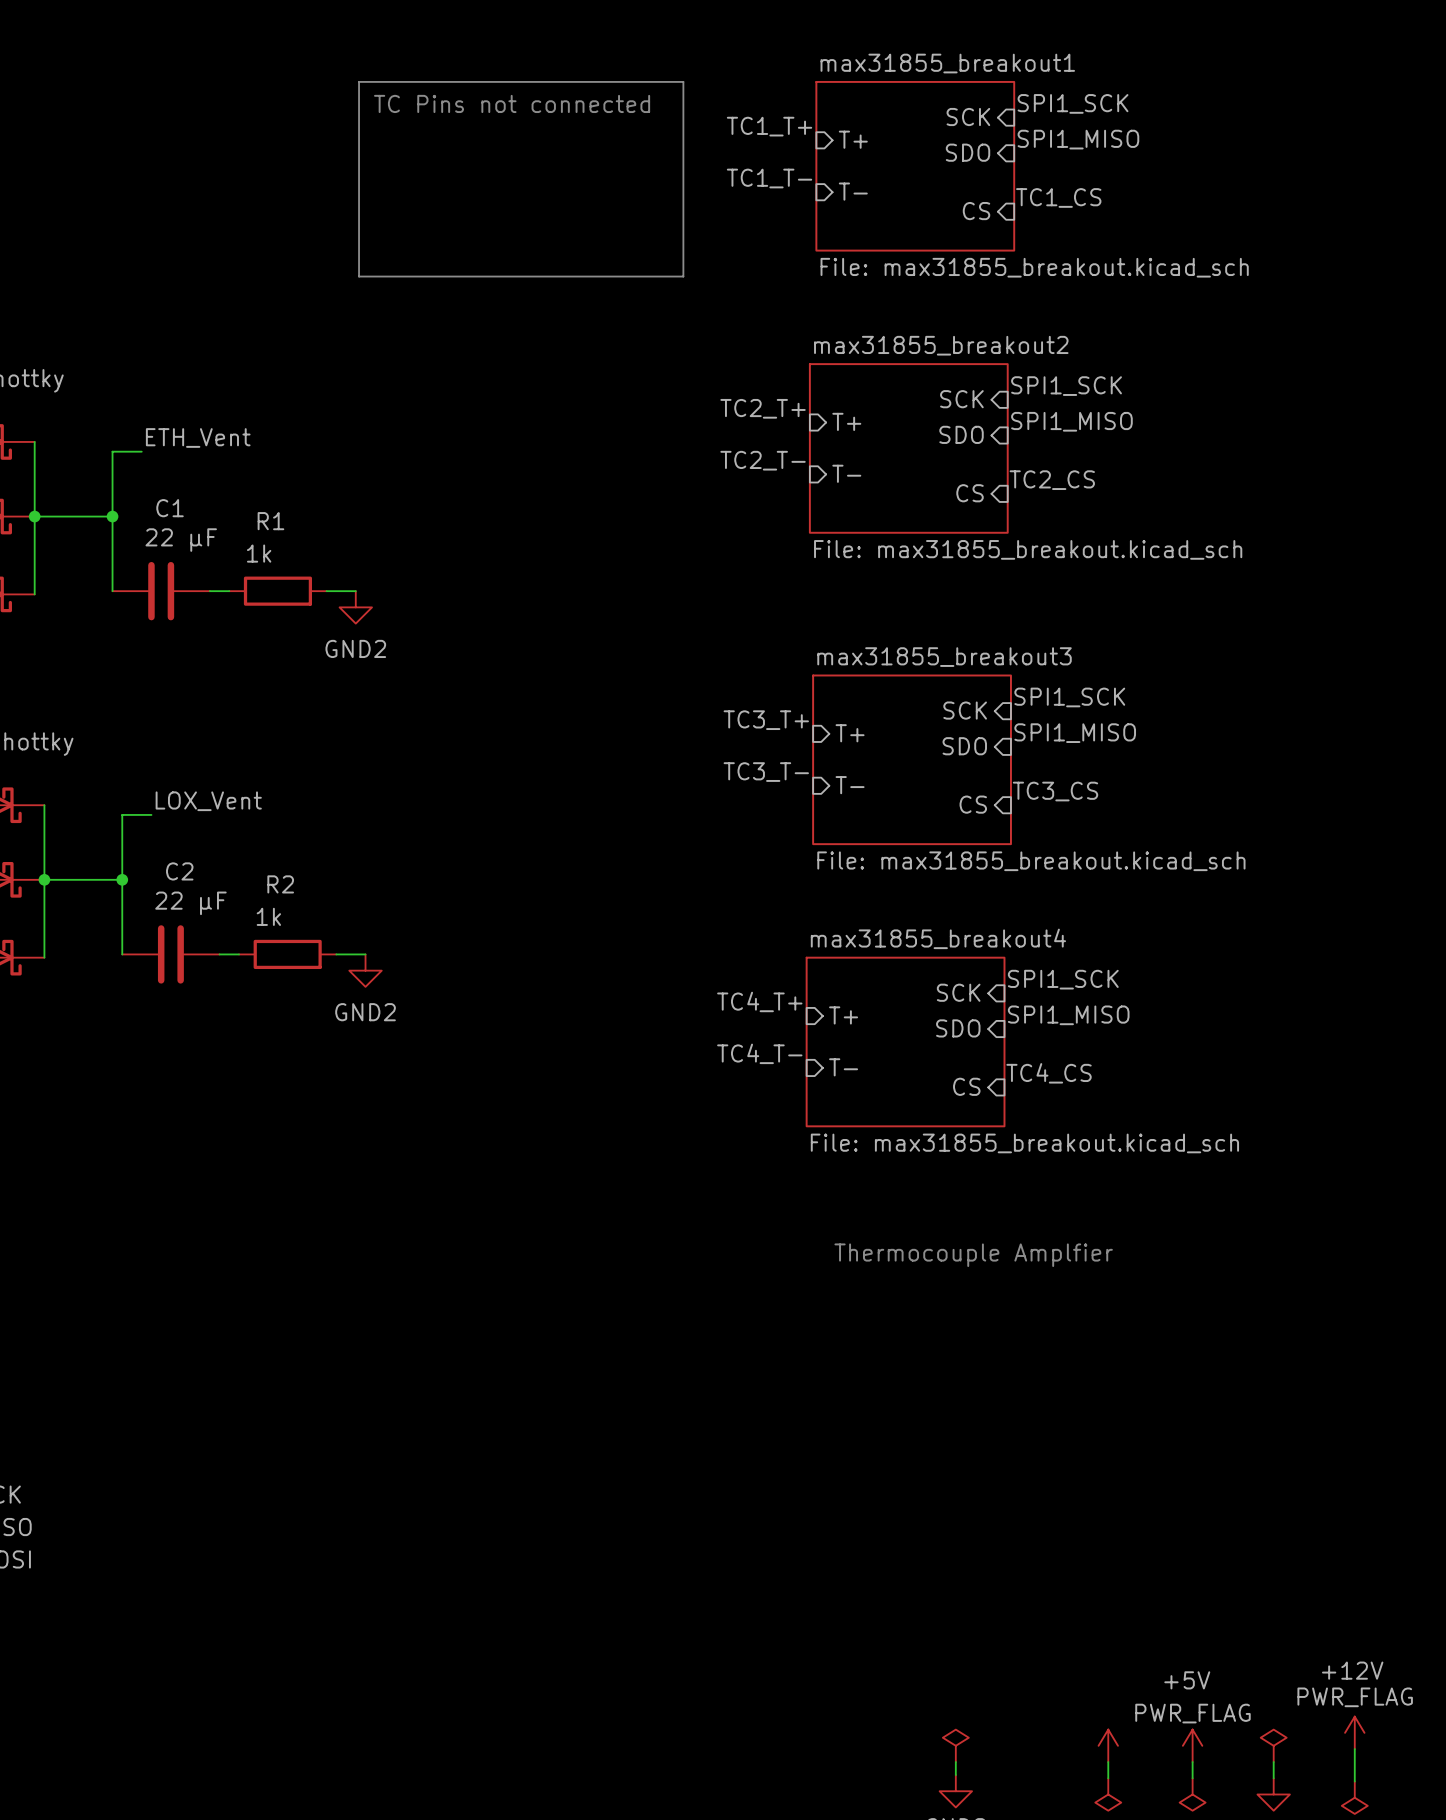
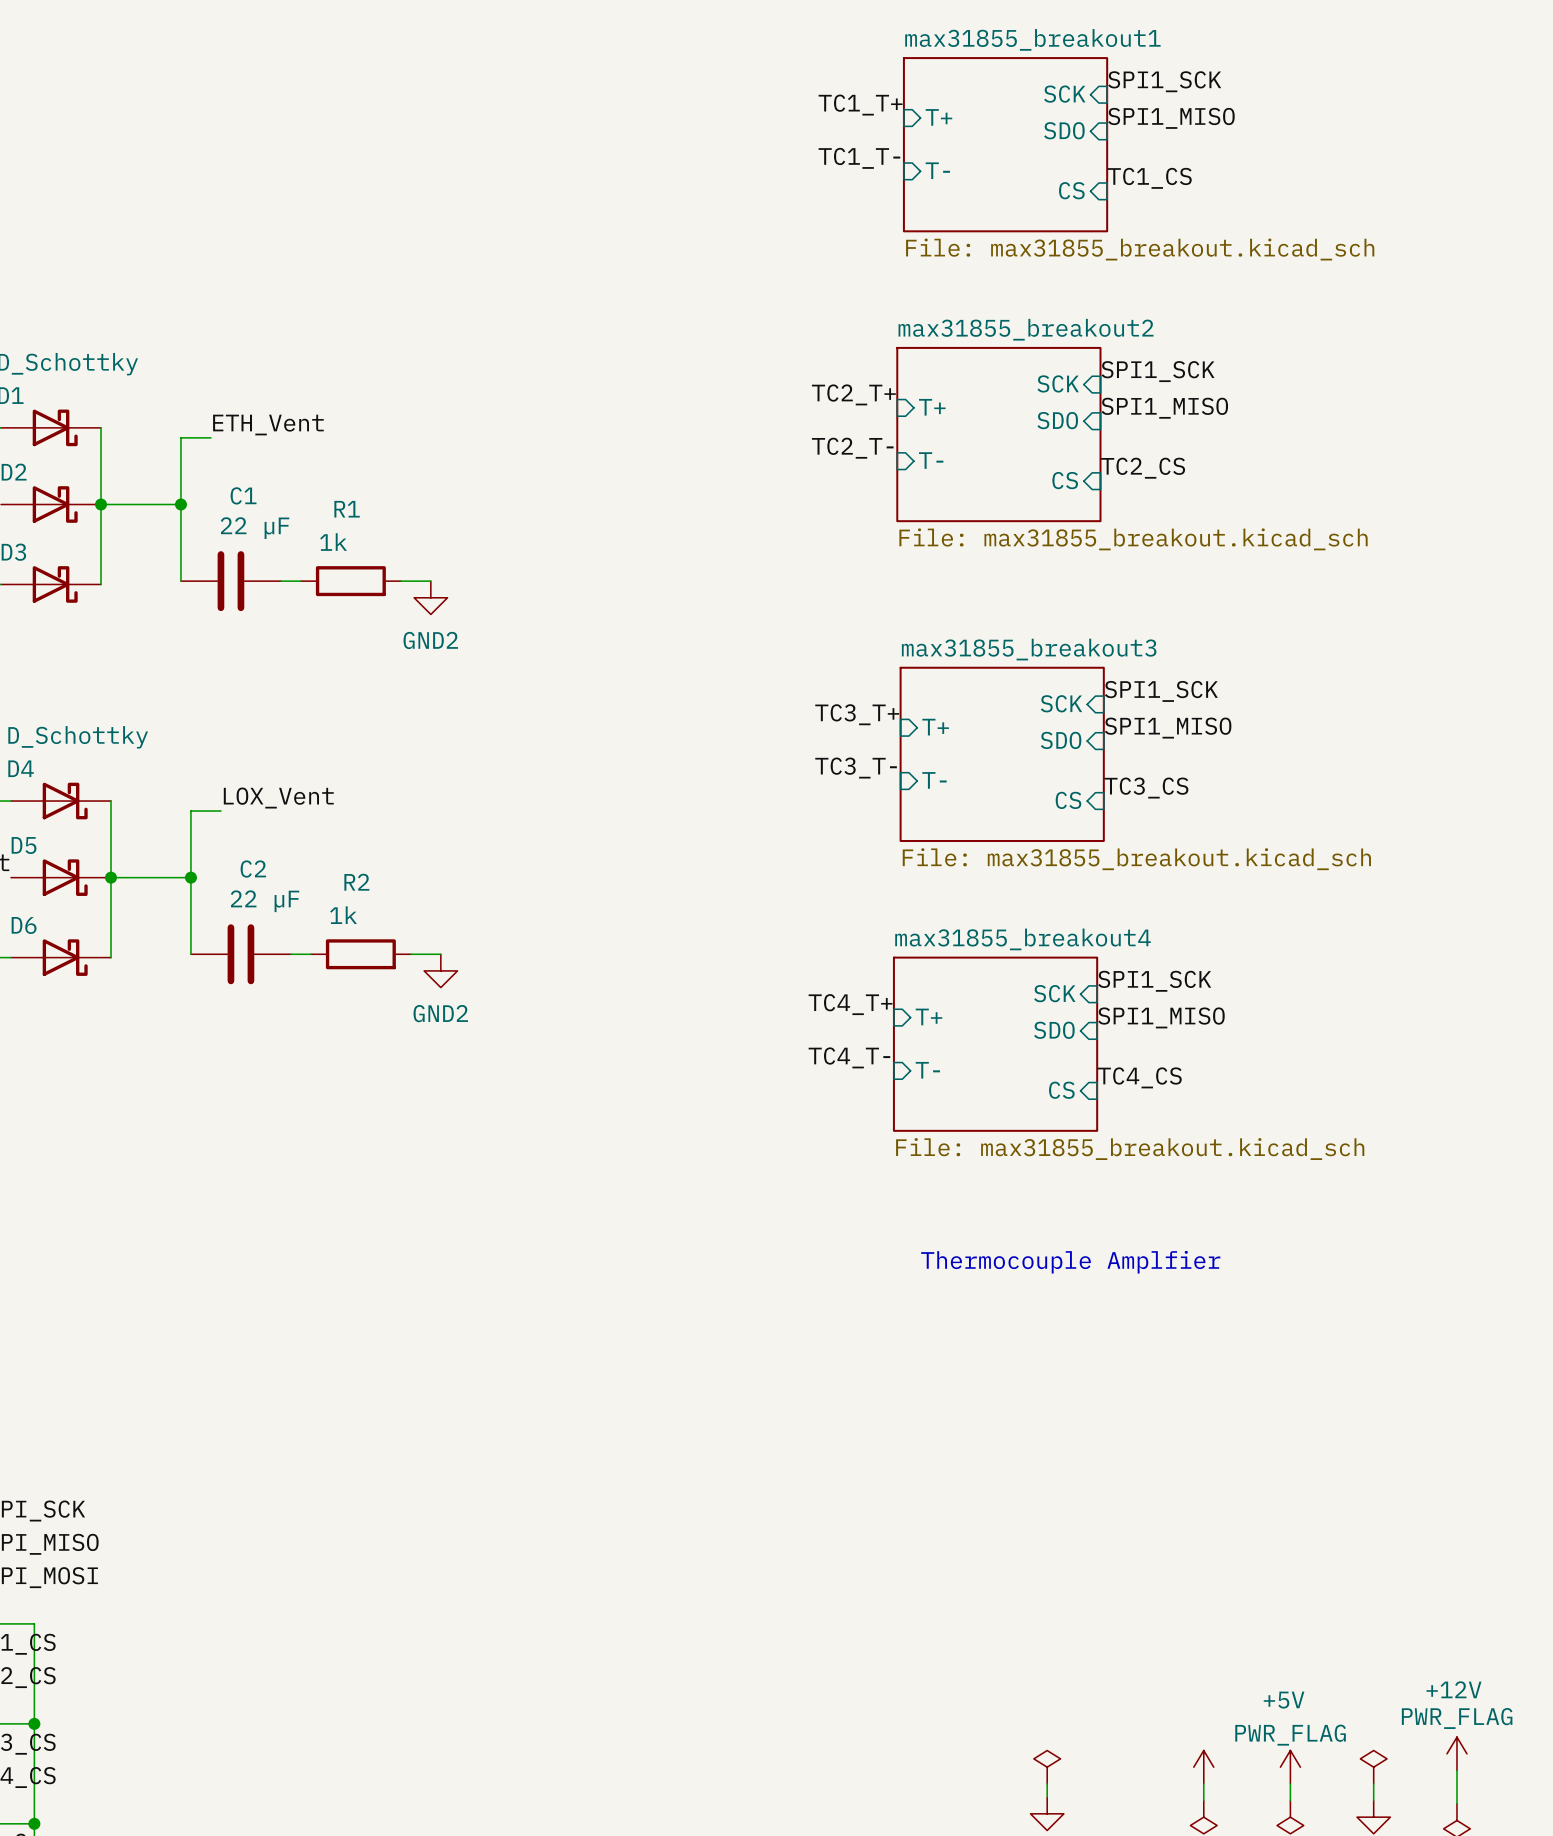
line: (359, 81) (683, 81) (683, 276) (359, 276) (359, 81) -> none
text: TC Pins not connected (512, 103) -> none

